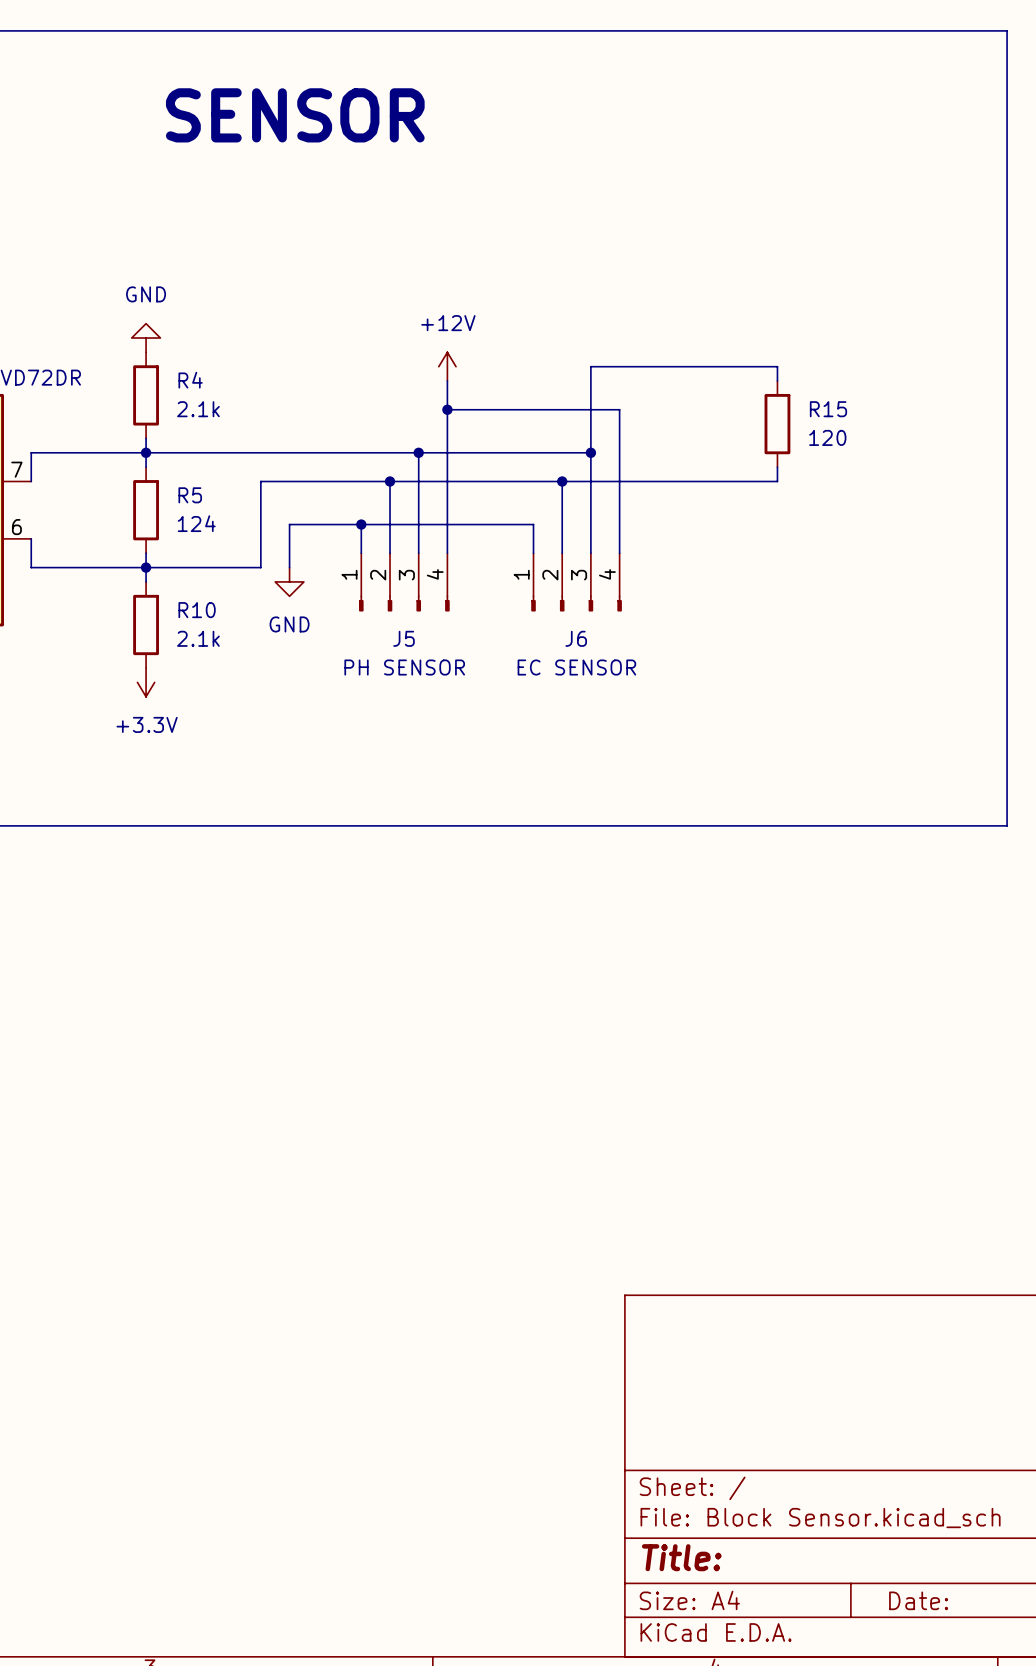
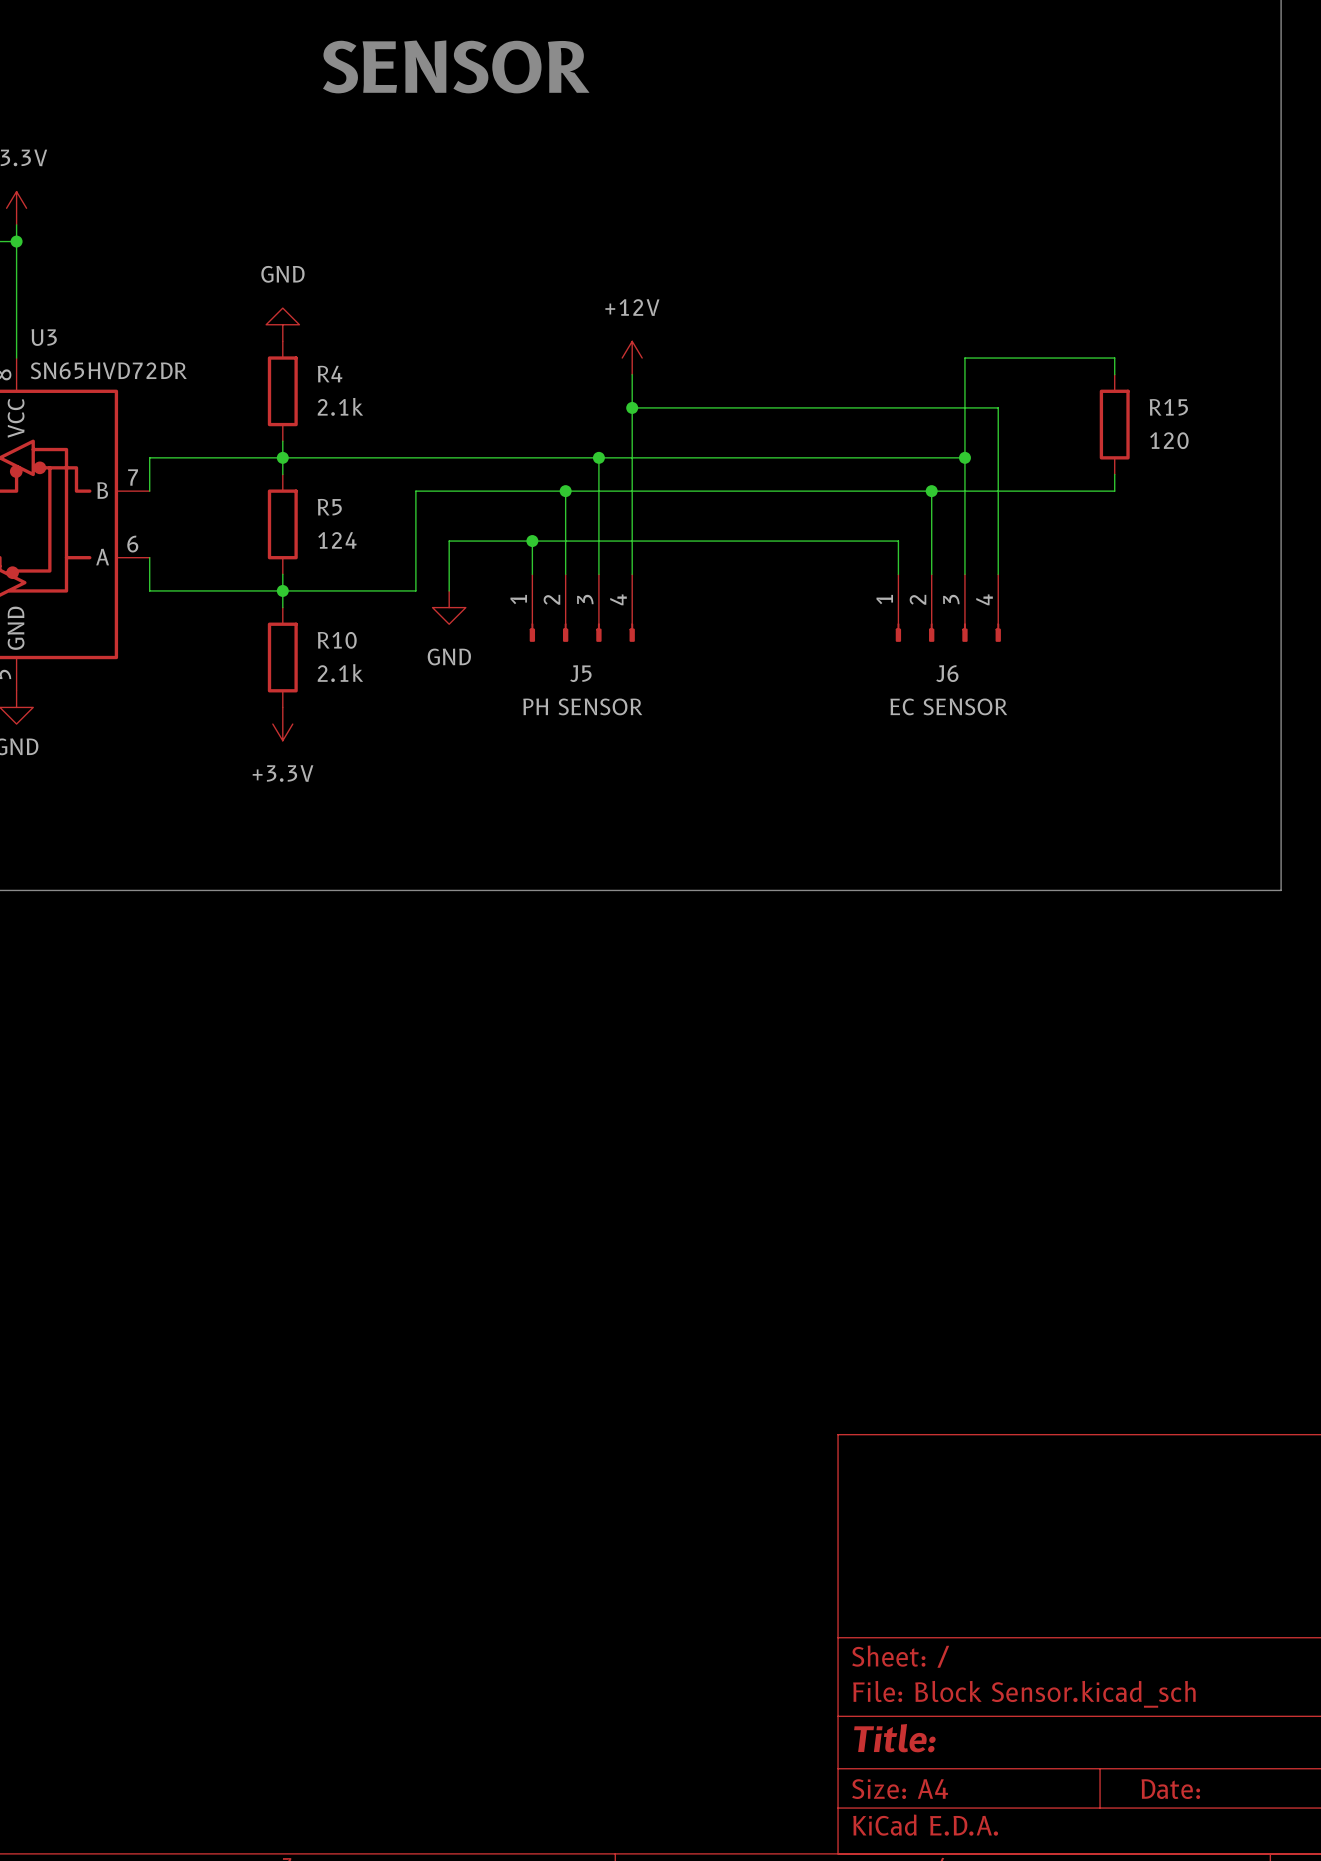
wire: (734, 366) (590, 366) (590, 553) -> (964, 358) (964, 574)
wire: (777, 366) (777, 381) -> (1014, 358) (1114, 358) (1114, 374)
wire: (619, 409) (619, 553) -> (831, 407) (998, 407) (998, 574)
R15 position: (777, 424) -> (1114, 424)
wire: none -> (798, 457) (964, 457)
junction: (590, 452) -> none
junction: none -> (964, 457)
wire: (777, 467) (777, 481) -> (1114, 474) (1114, 491) (1014, 491)
wire: (562, 481) (562, 553) -> (931, 491) (931, 574)
junction: (562, 481) -> none
junction: none -> (931, 491)
wire: (533, 524) (533, 553) -> (732, 541) (898, 541) (898, 574)
J6 position: (576, 582) -> (948, 608)

